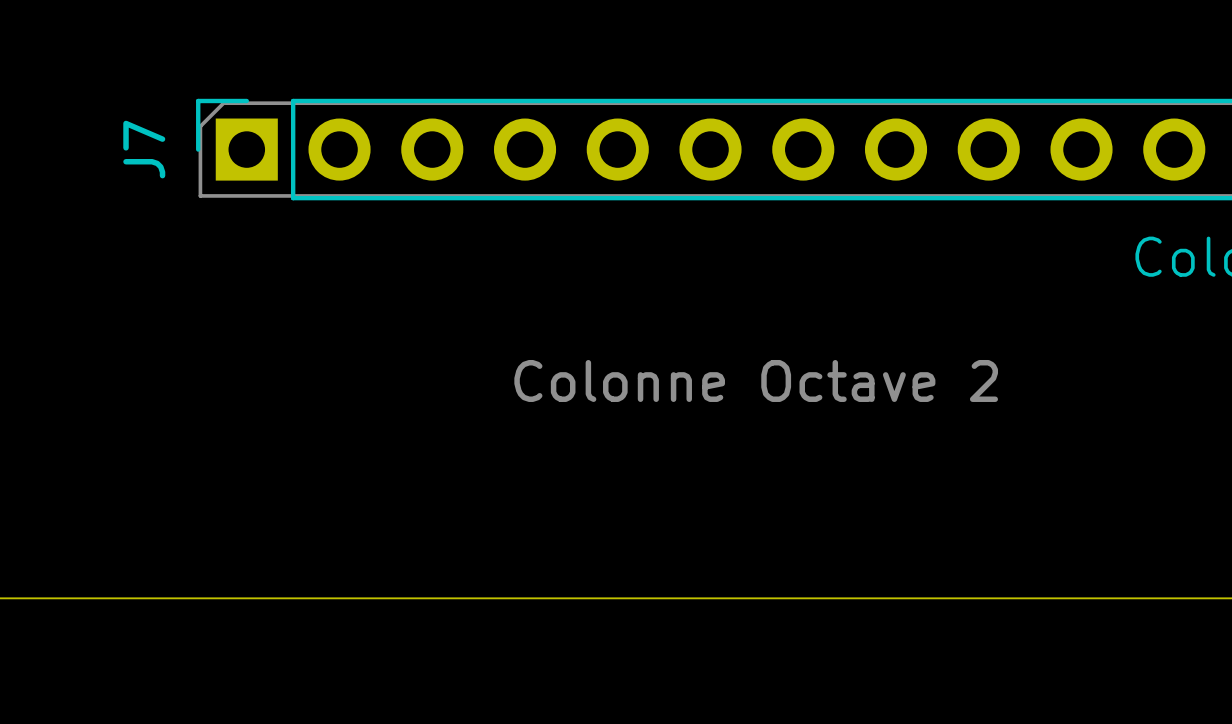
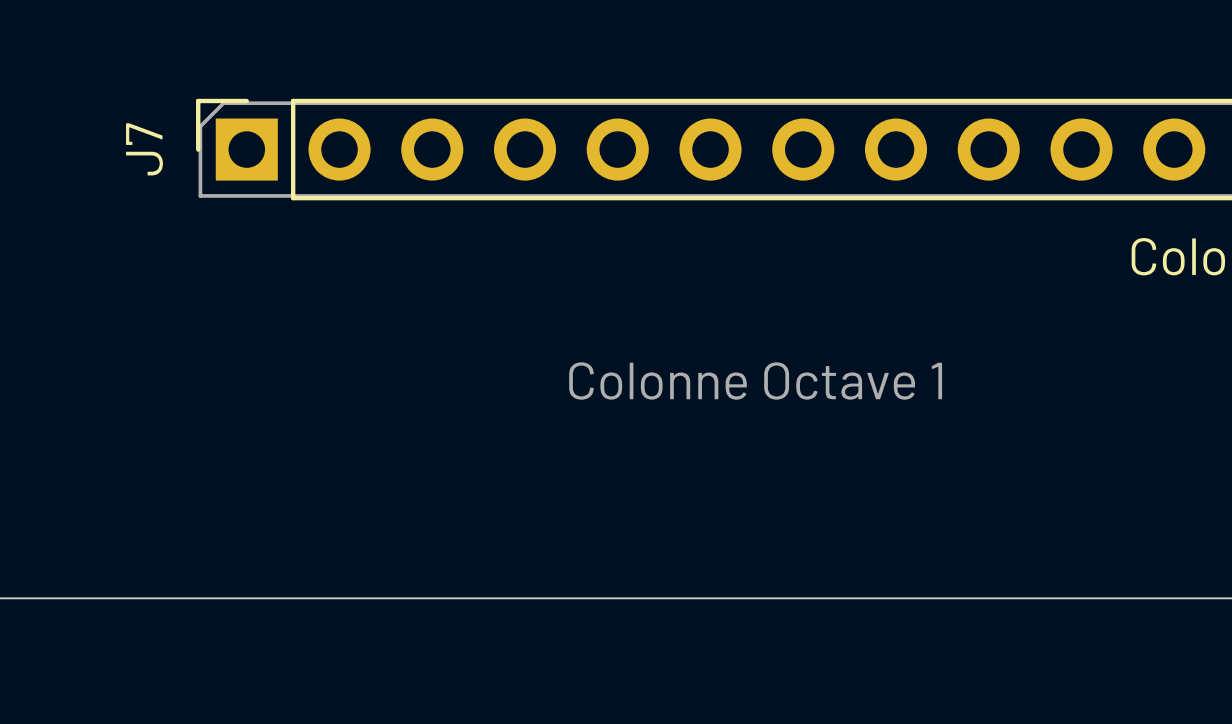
J7 value: Colonne Octave 2 (756, 380) -> Colonne Octave 1 (755, 381)

